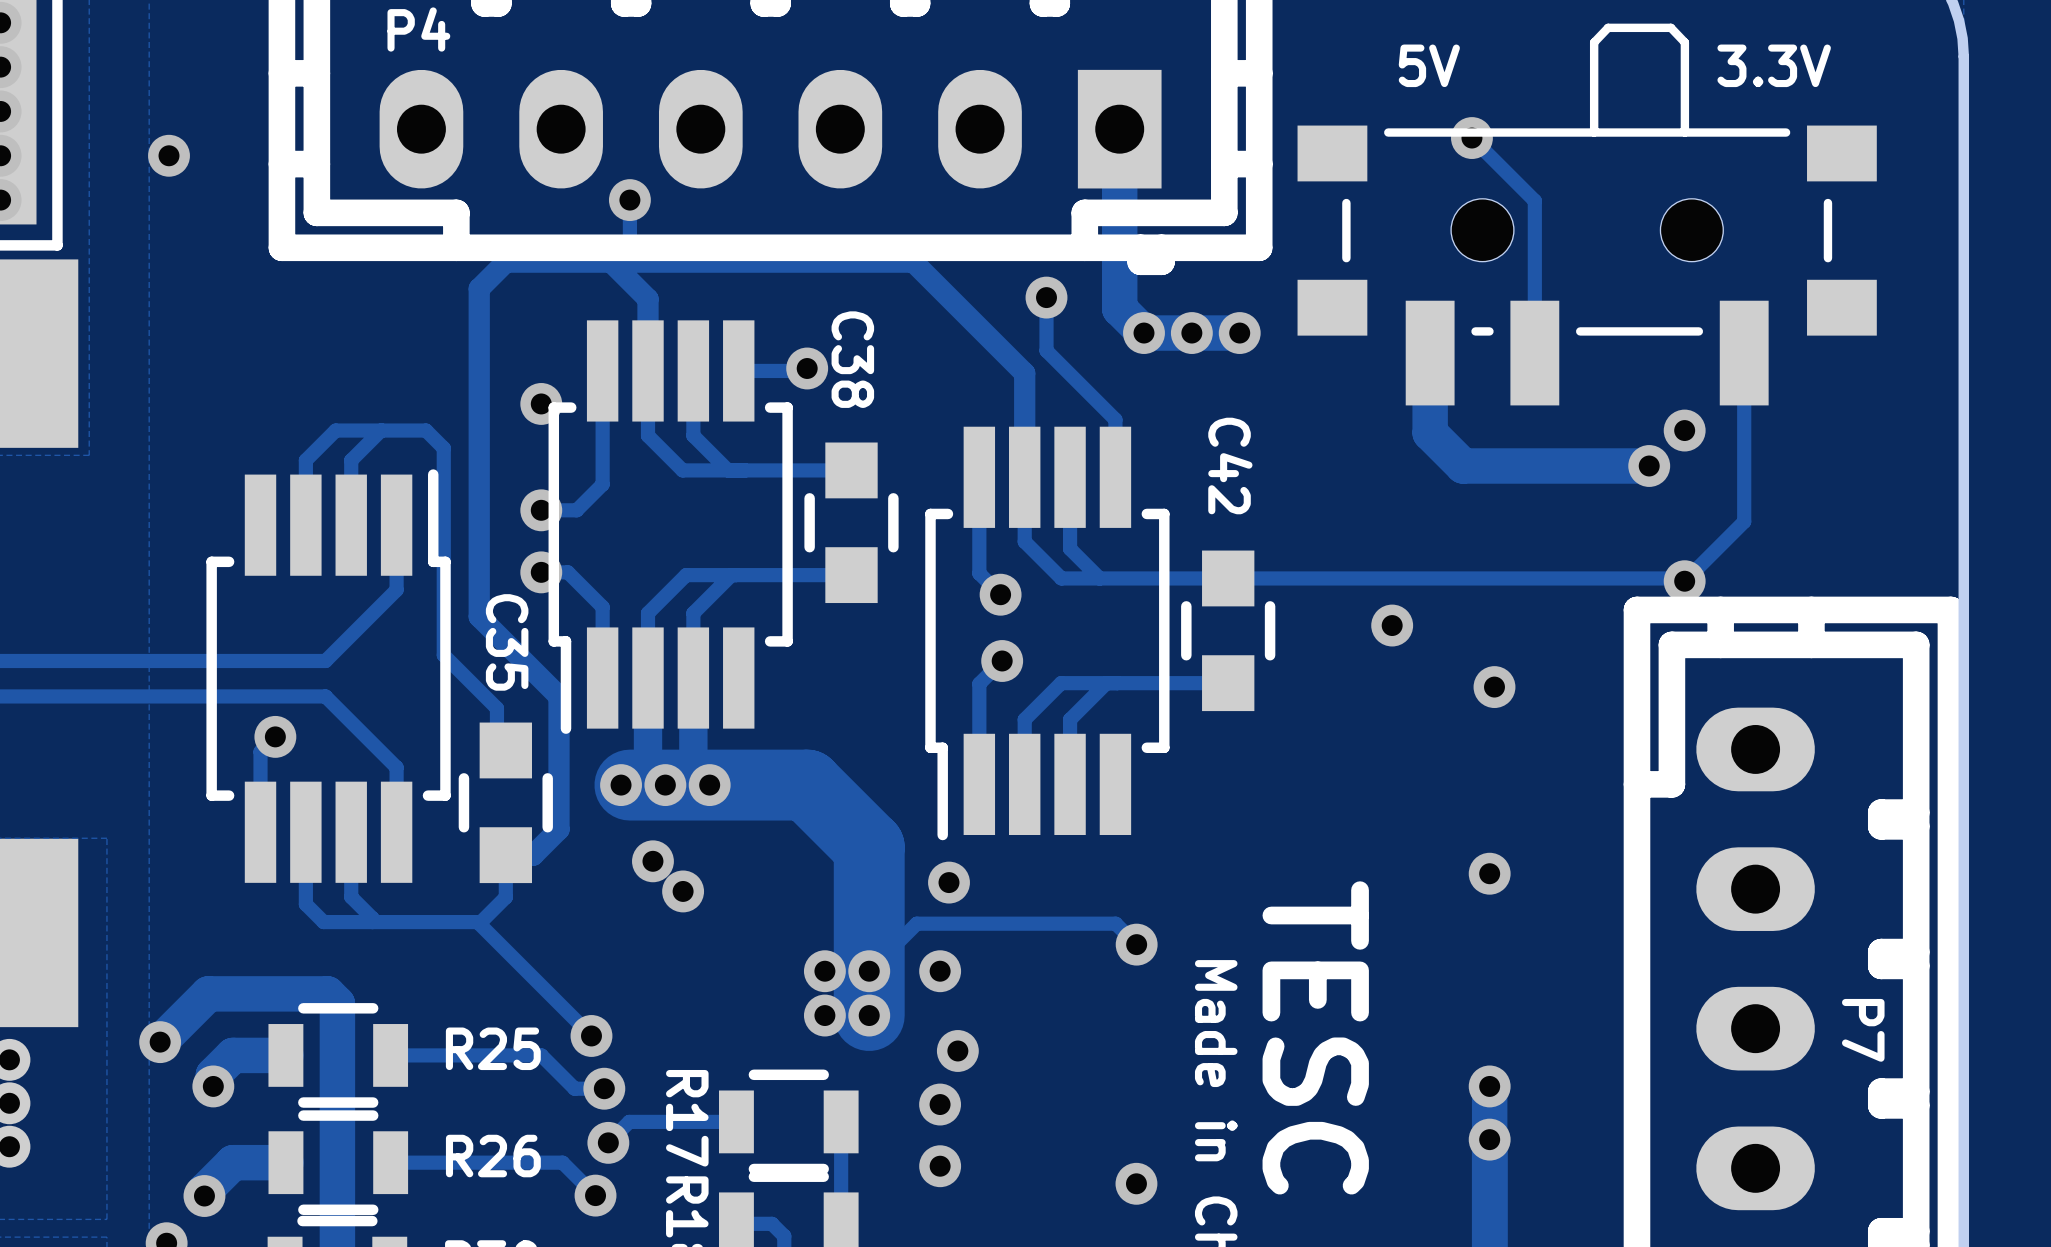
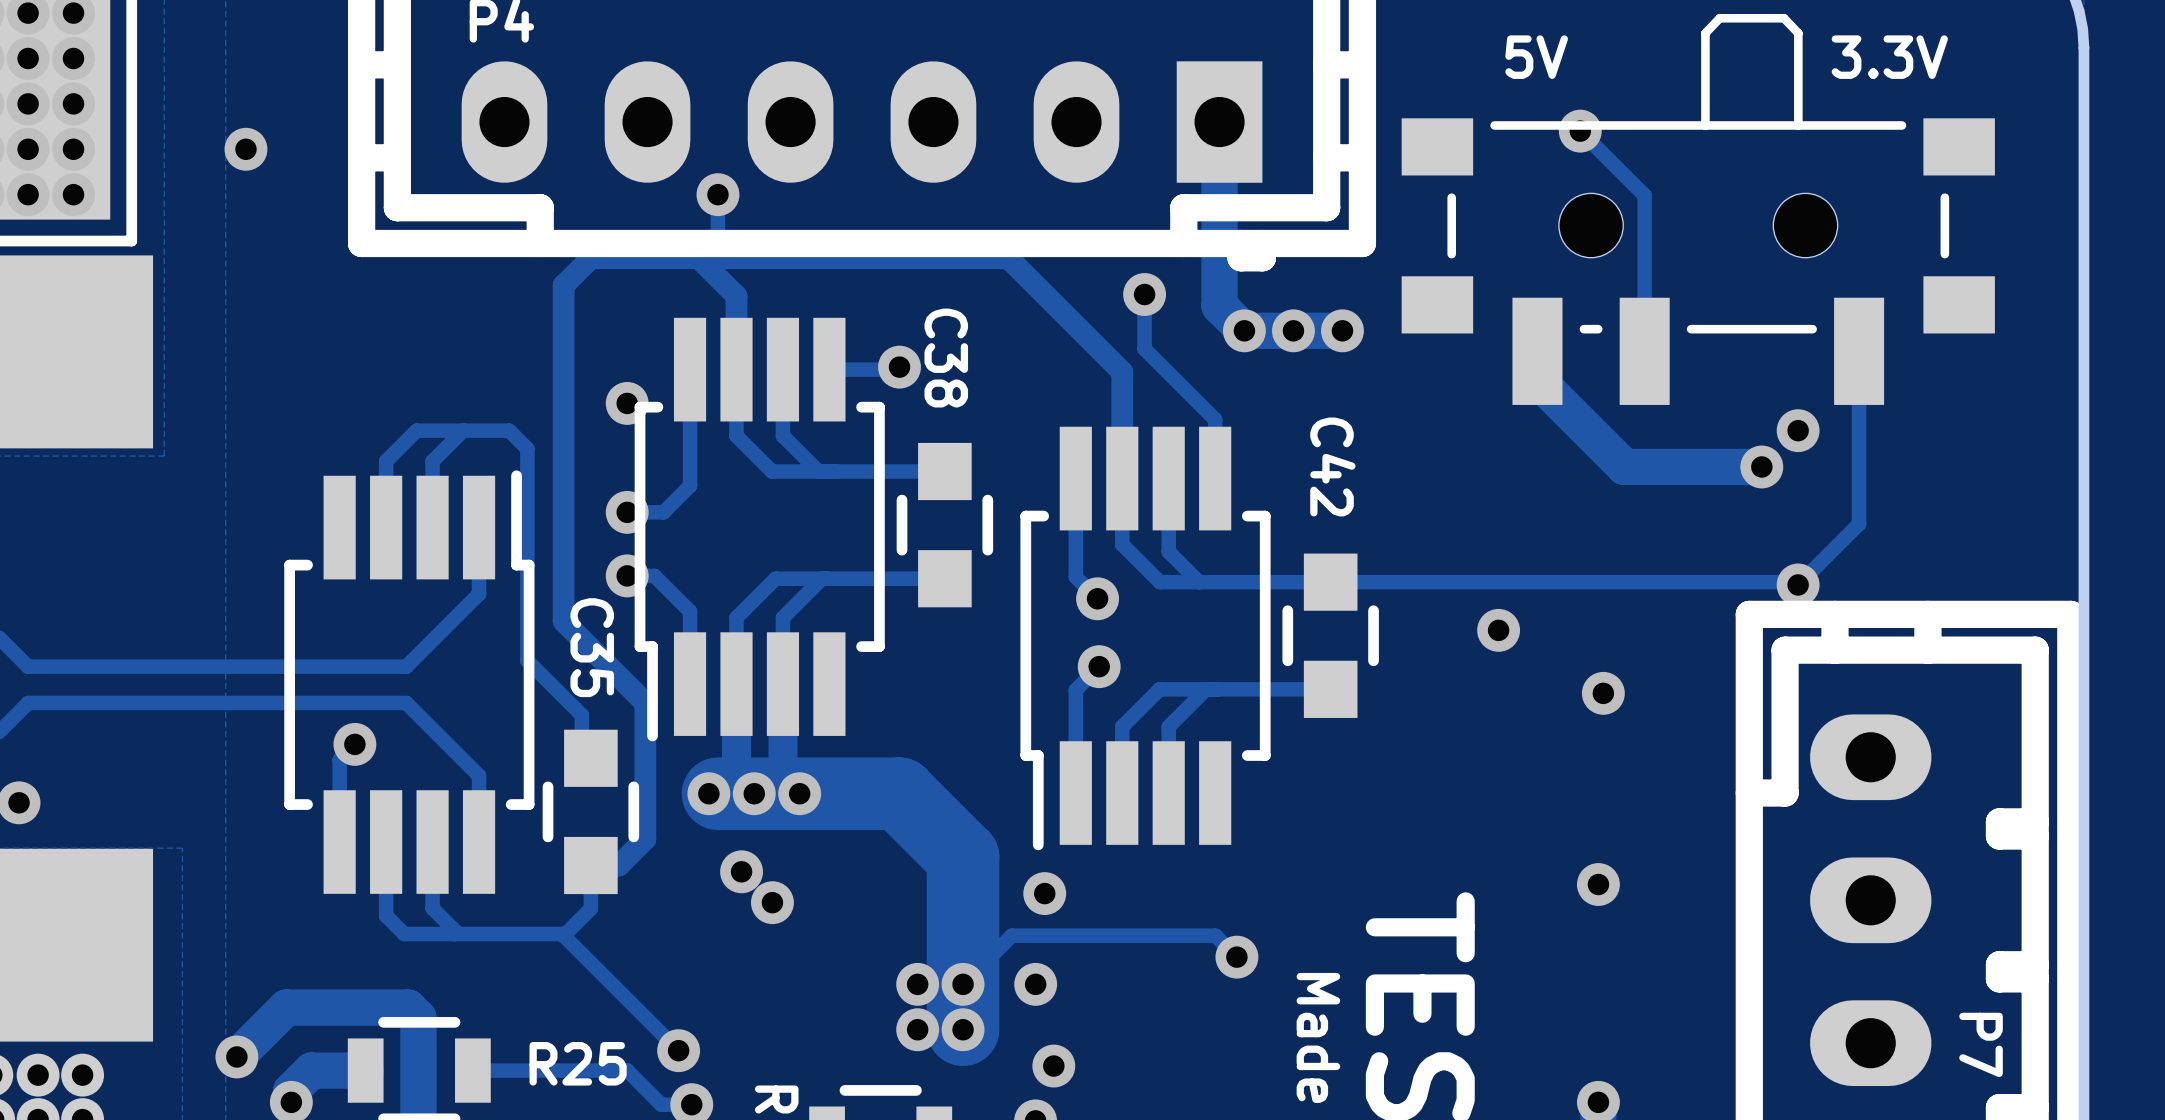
track: (1430, 380) (1430, 433) (1463, 466) (1515, 466) -> (1537, 379) (1624, 466)

